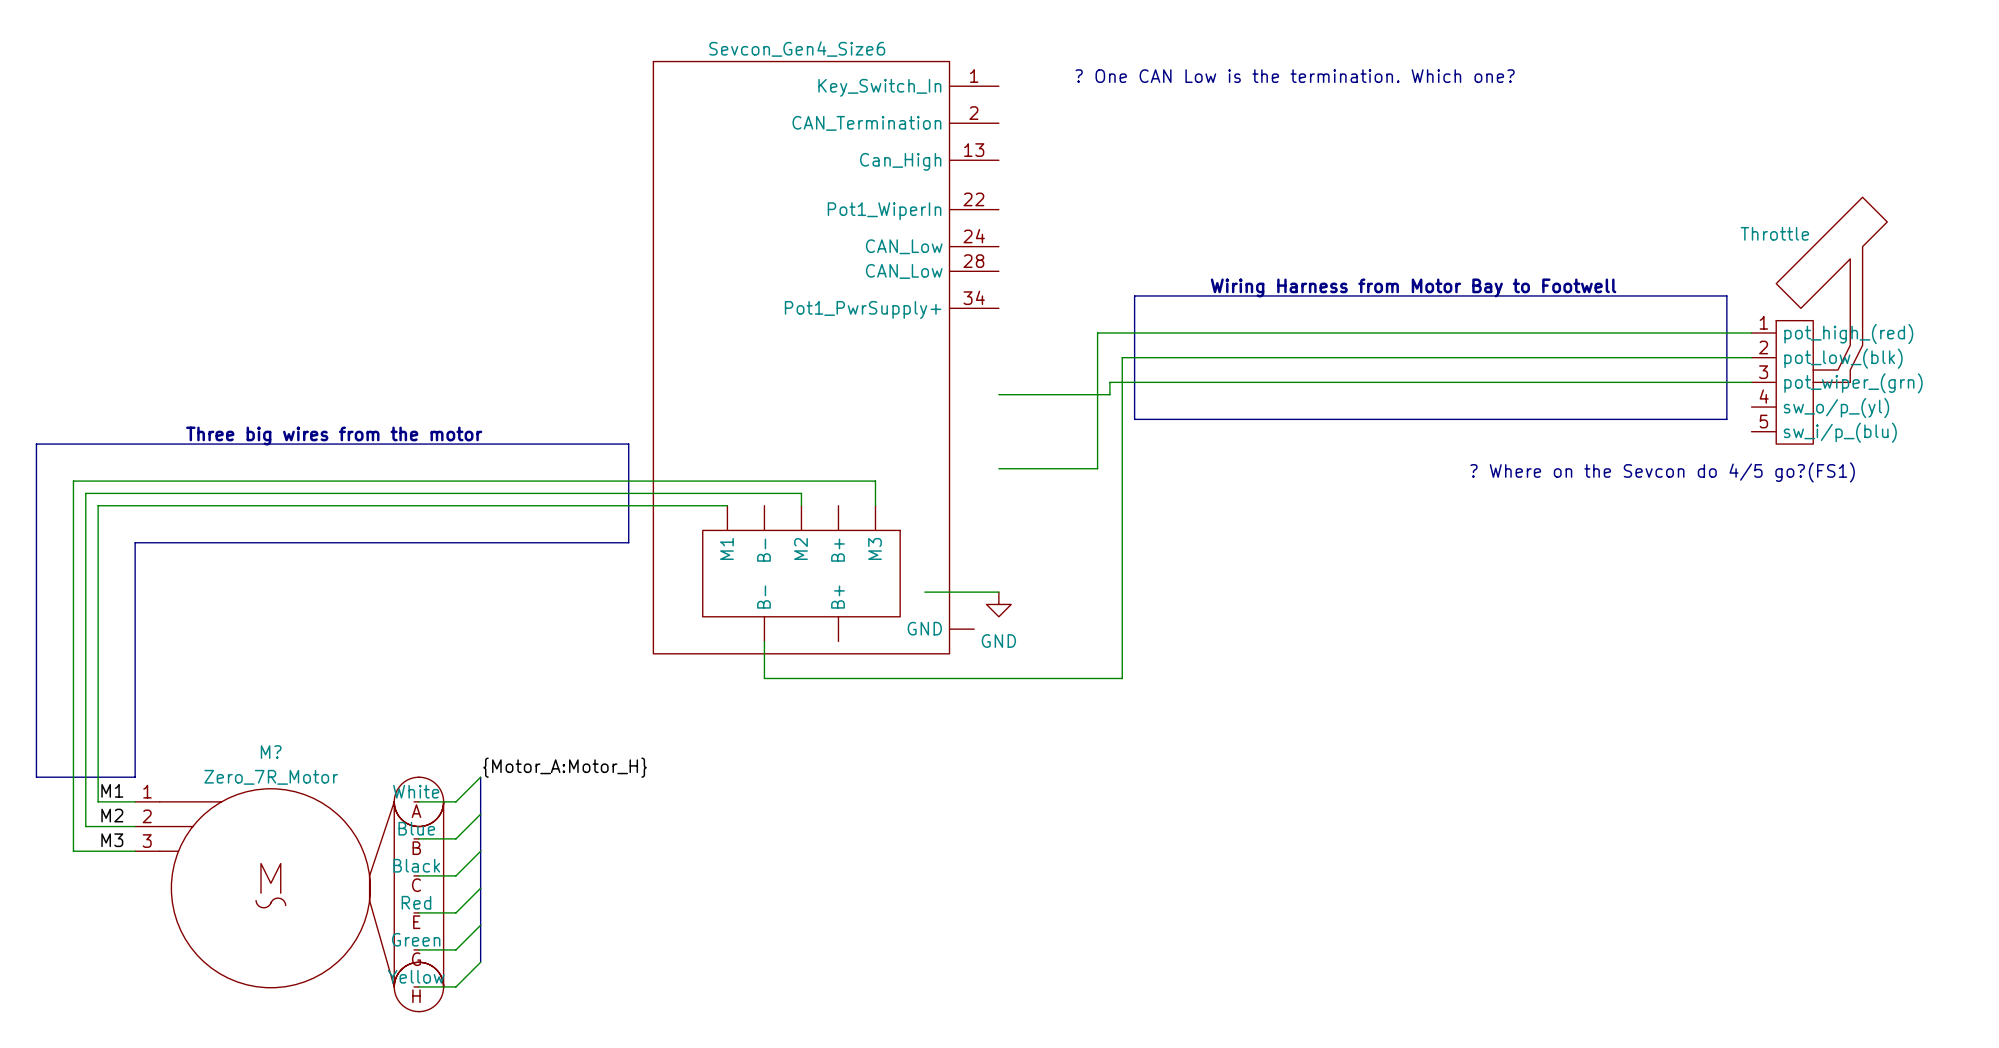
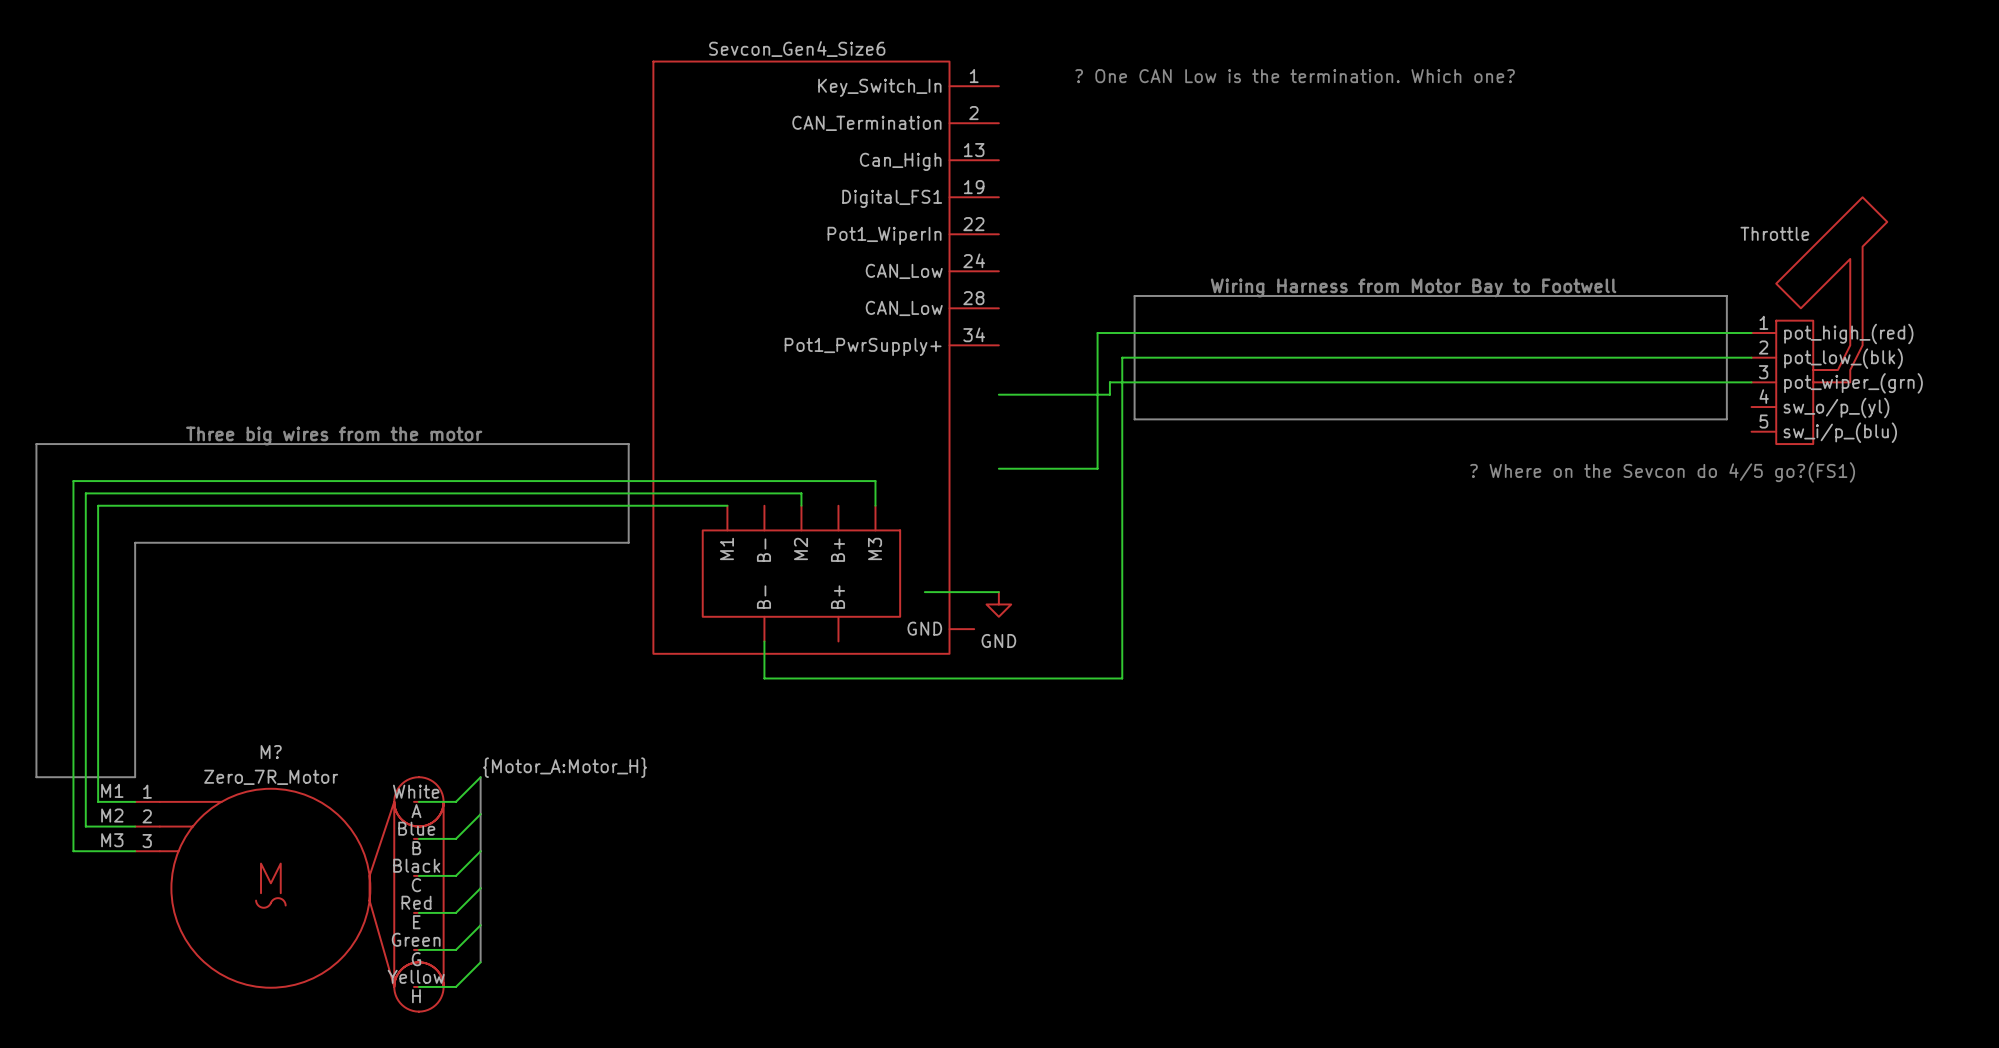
part symbol: [653, 61, 999, 654] -> [653, 61, 999, 654]

